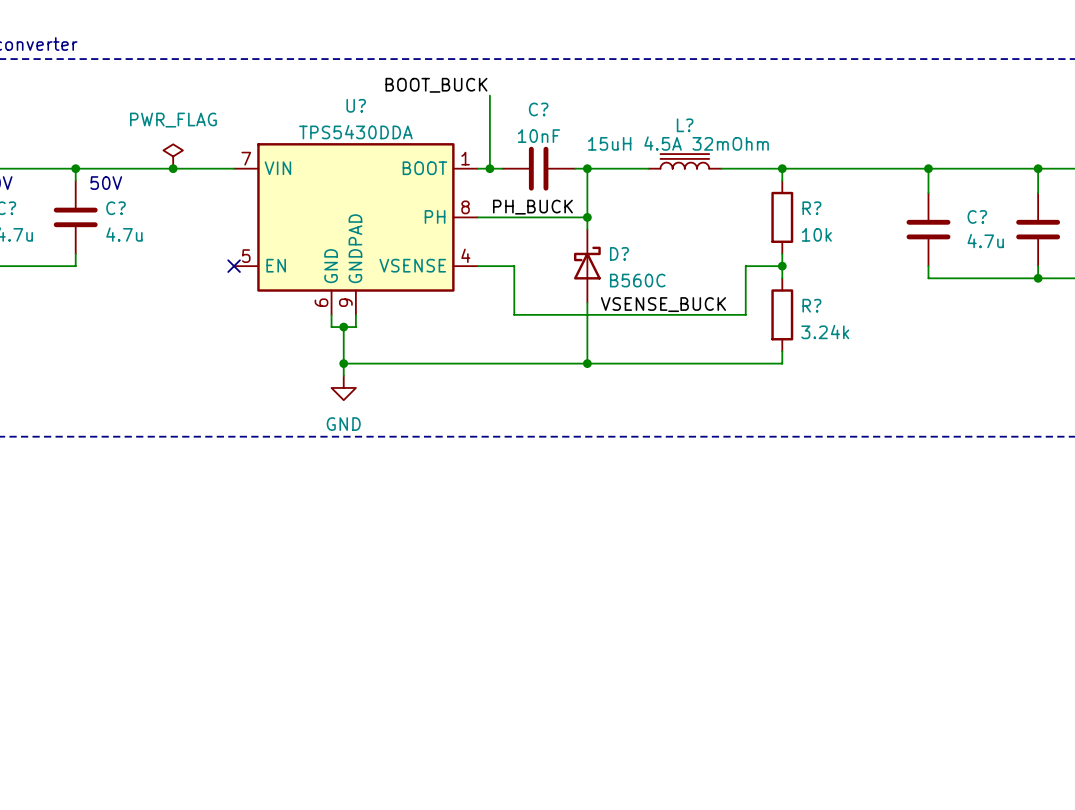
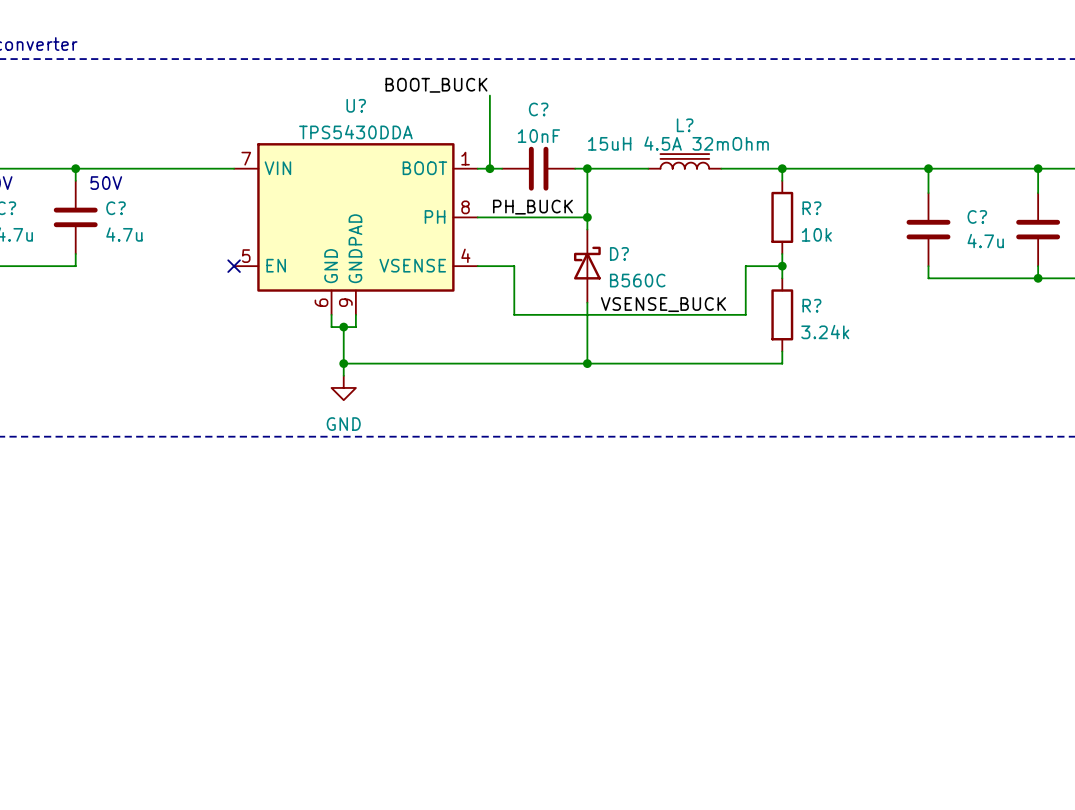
power symbol: PWR_FLAG (173, 156) -> none
junction: (173, 168) -> none

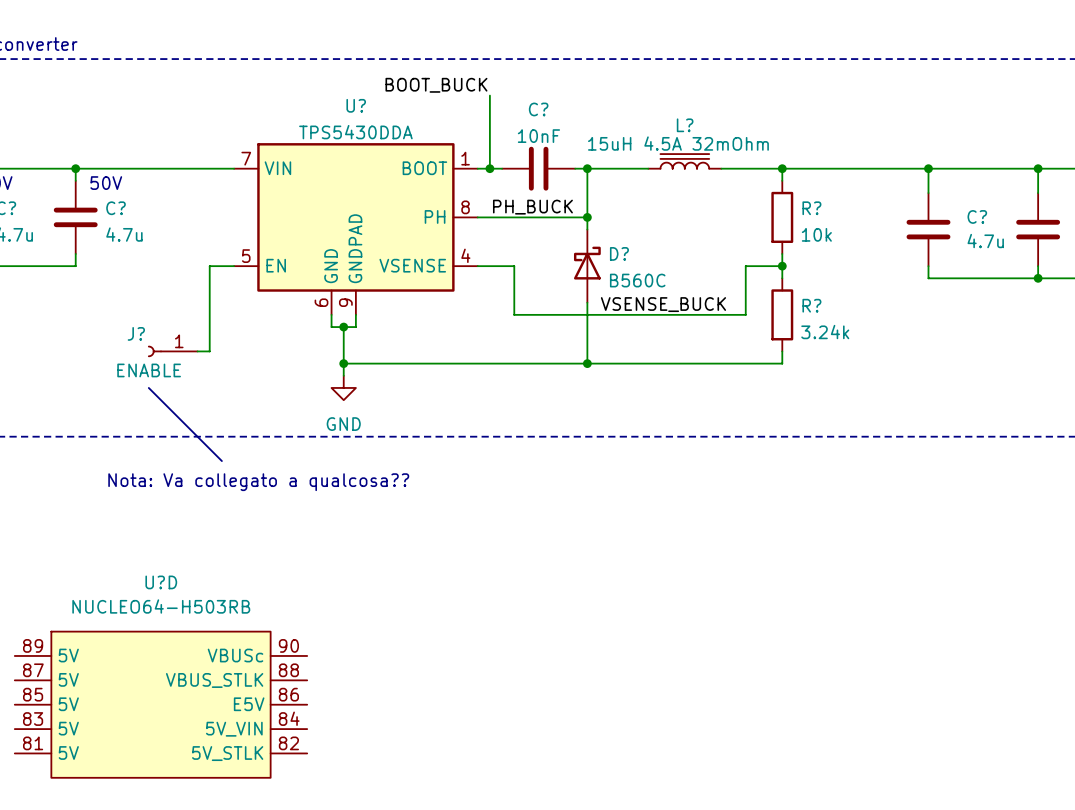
wire: none -> (234, 266) (209, 266) (209, 351) (197, 351)
no-connect mark: (234, 266) -> none
J?: none -> ENABLE (172, 351)
line: none -> (148, 387) (221, 461)
text: none -> Nota: Va collegato a qualcosa?? (258, 482)
U?D: none -> NUCLEO64-H503RB (160, 704)

